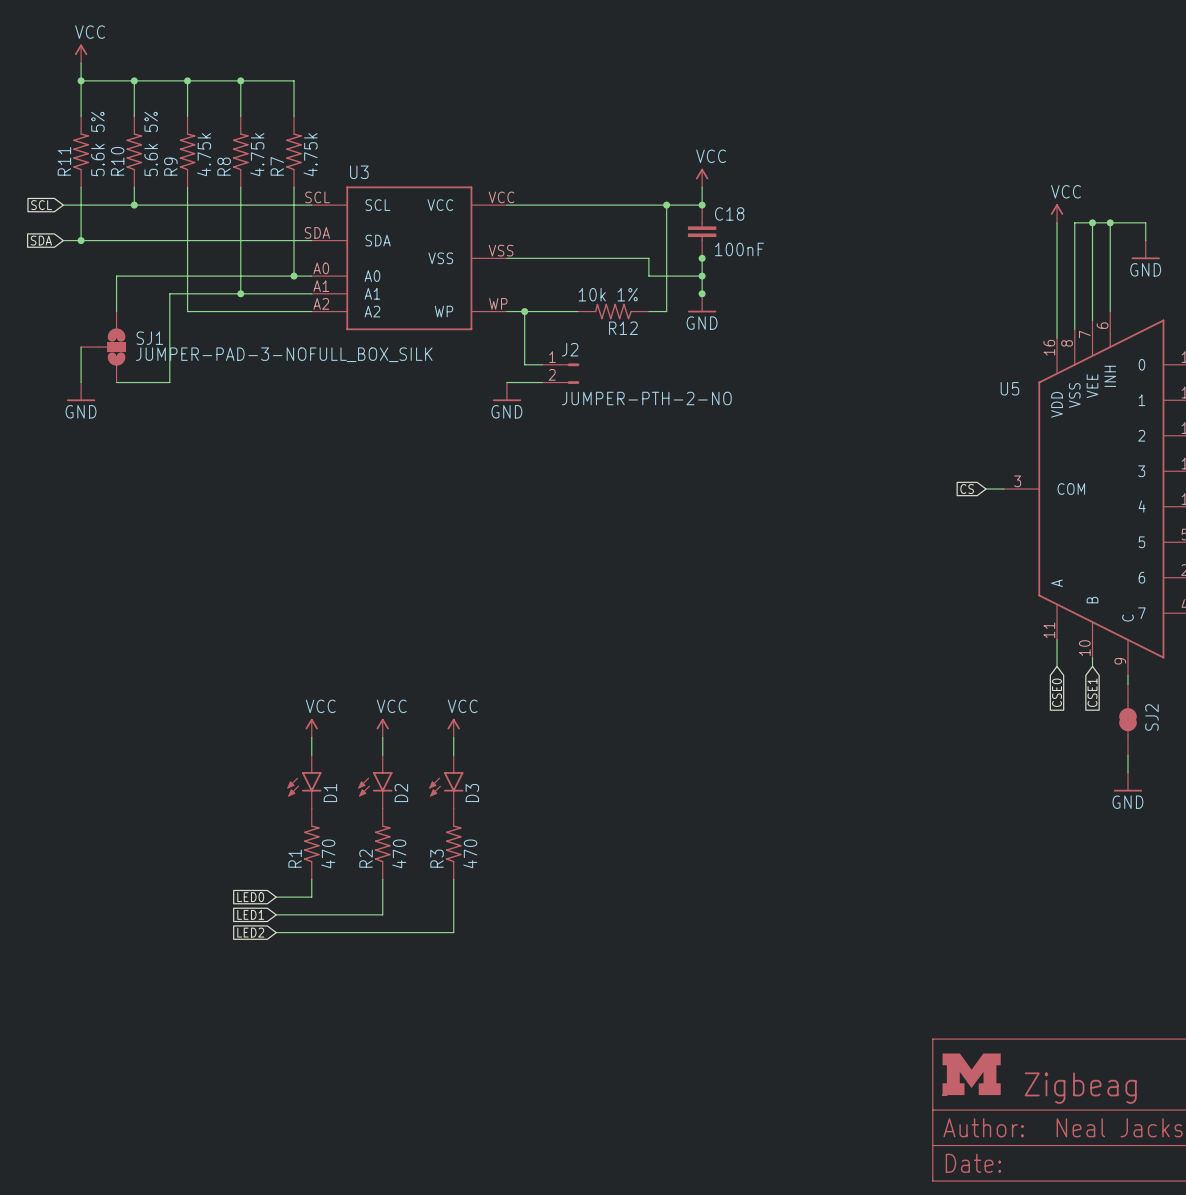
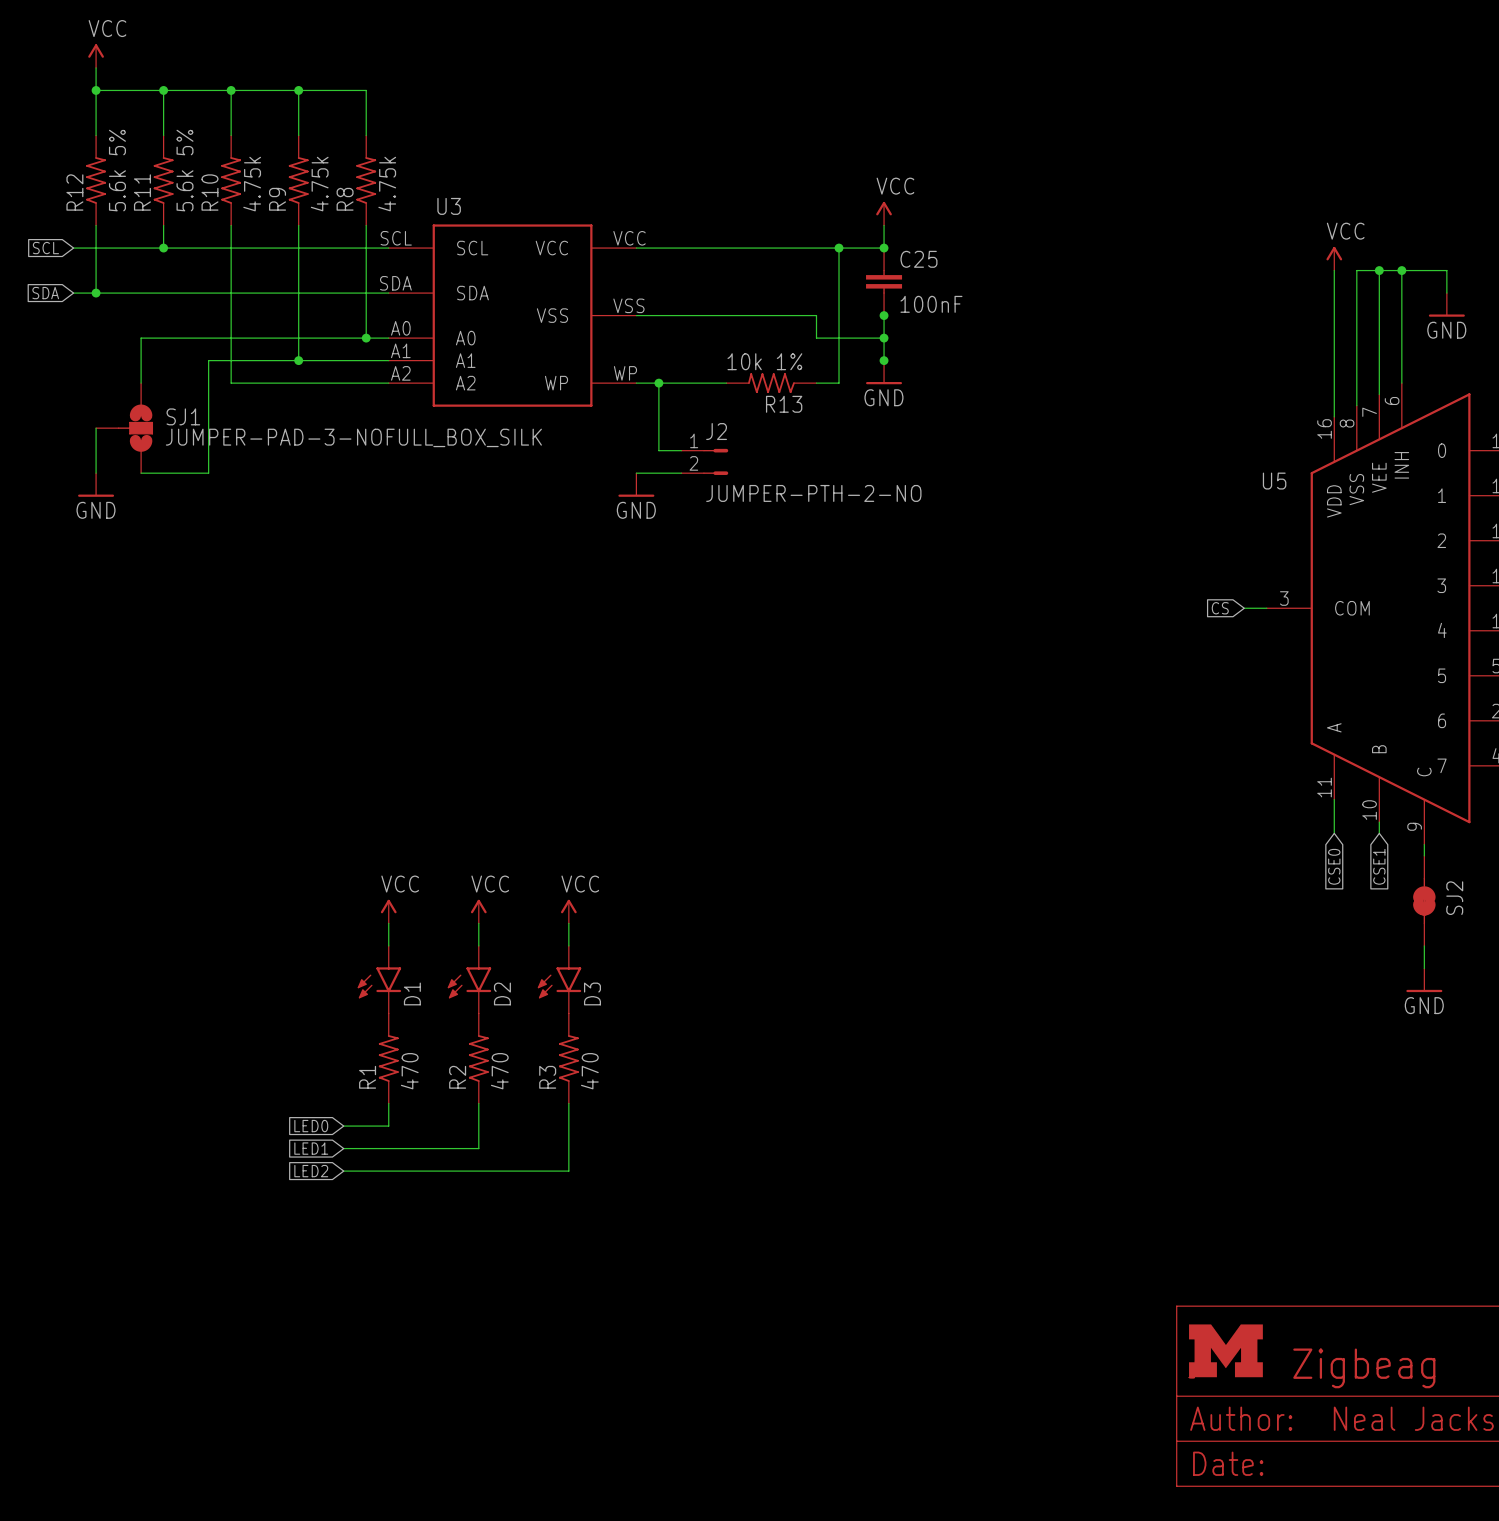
R11 name: R11 (64, 161) -> R12 (74, 192)
R10 name: R10 (117, 161) -> R11 (142, 192)
R9 name: R9 (170, 166) -> R10 (209, 192)
R8 name: R8 (224, 166) -> R9 (277, 199)
R7 name: R7 (277, 166) -> R8 (345, 199)
C18 name: C18 (729, 213) -> C25 (918, 259)
R12 name: R12 (623, 328) -> R13 (784, 404)

